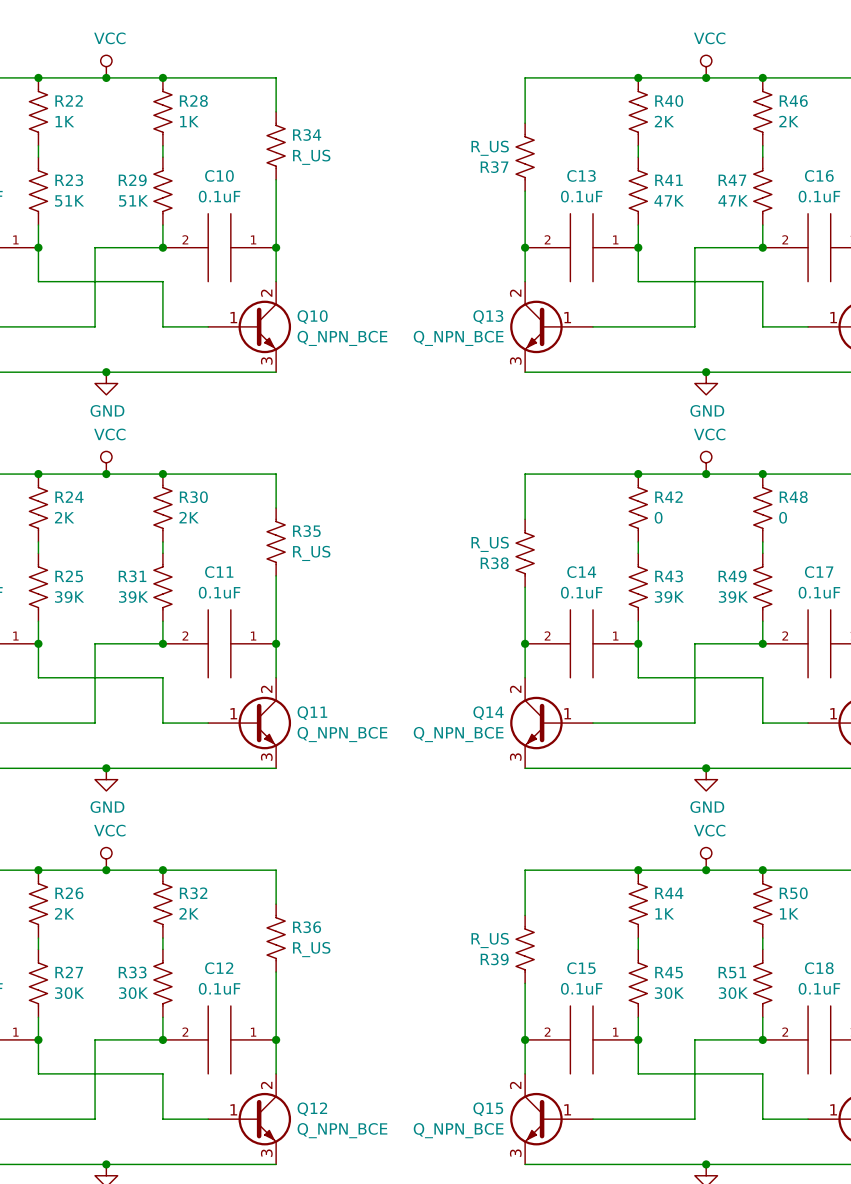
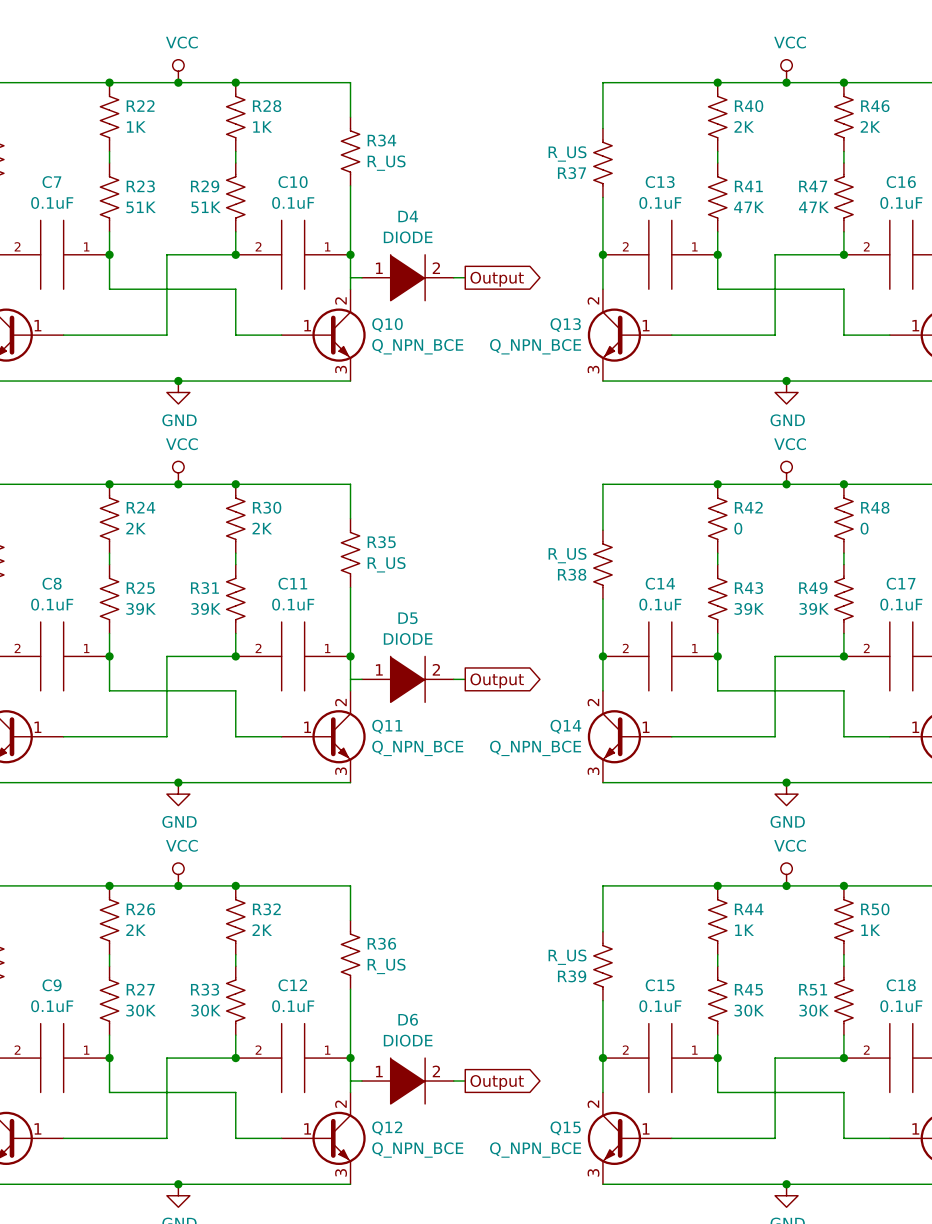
wire: none -> (350, 277) (361, 277)
D4: none -> DIODE (407, 277)
wire: none -> (453, 277) (465, 277)
global label: none -> Output (497, 279)
wire: none -> (350, 679) (361, 679)
D5: none -> DIODE (407, 679)
wire: none -> (453, 679) (465, 679)
global label: none -> Output (497, 680)
wire: none -> (350, 1081) (361, 1081)
D6: none -> DIODE (407, 1081)
wire: none -> (453, 1081) (465, 1081)
global label: none -> Output (497, 1082)

